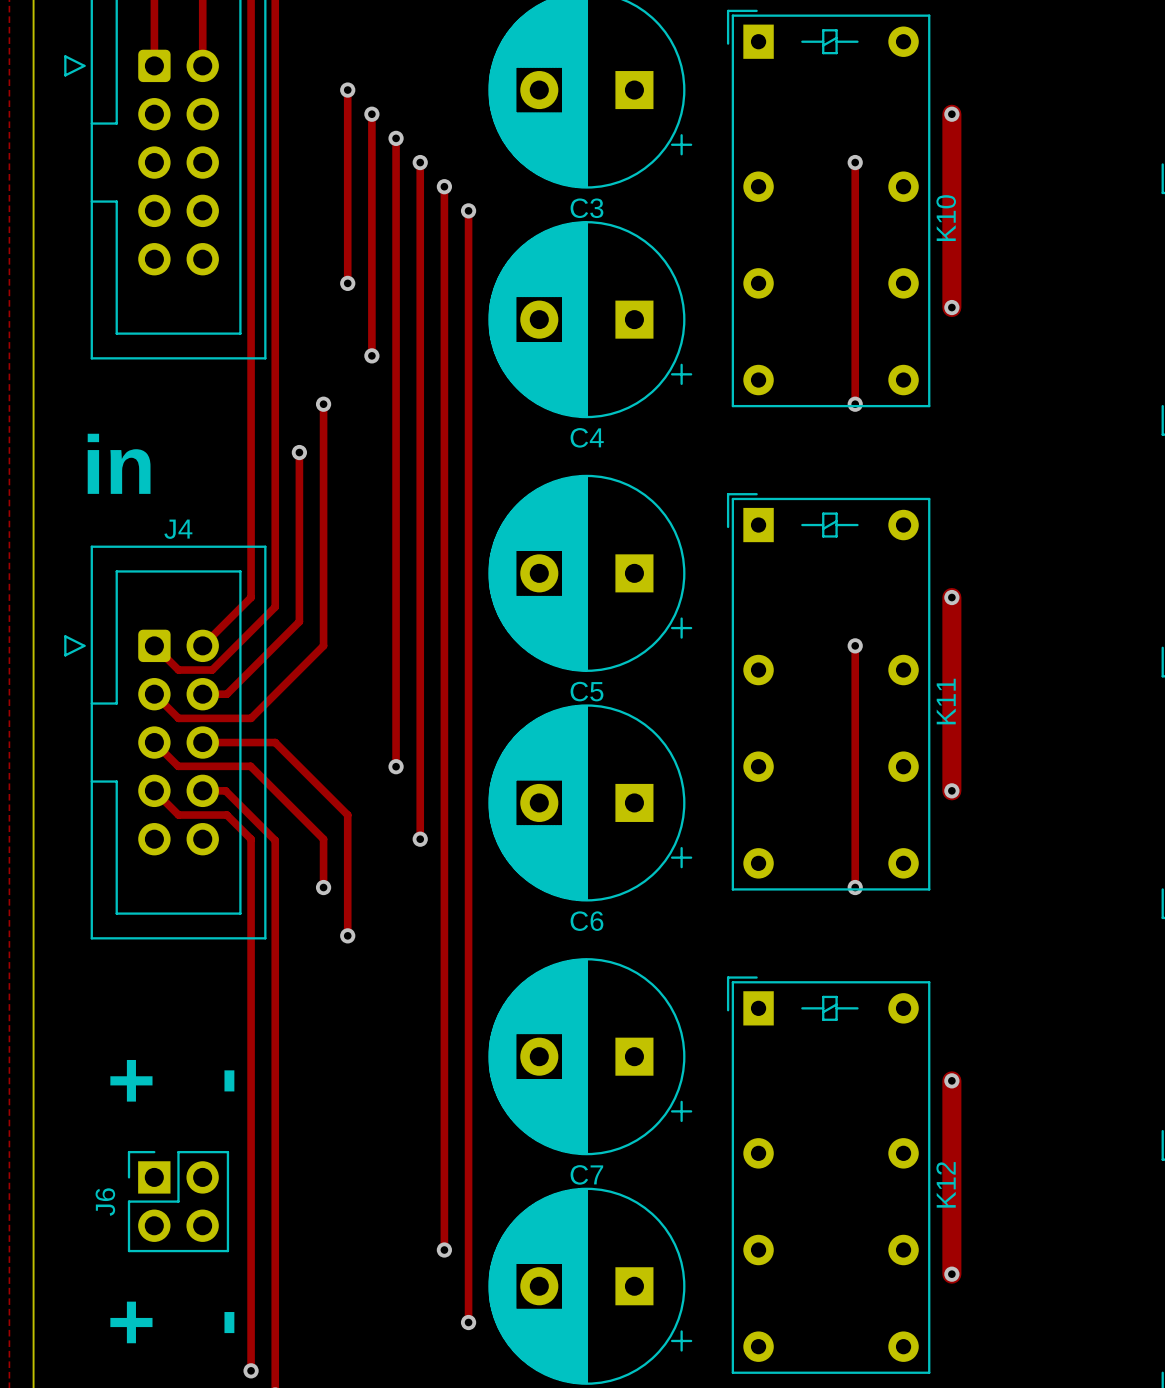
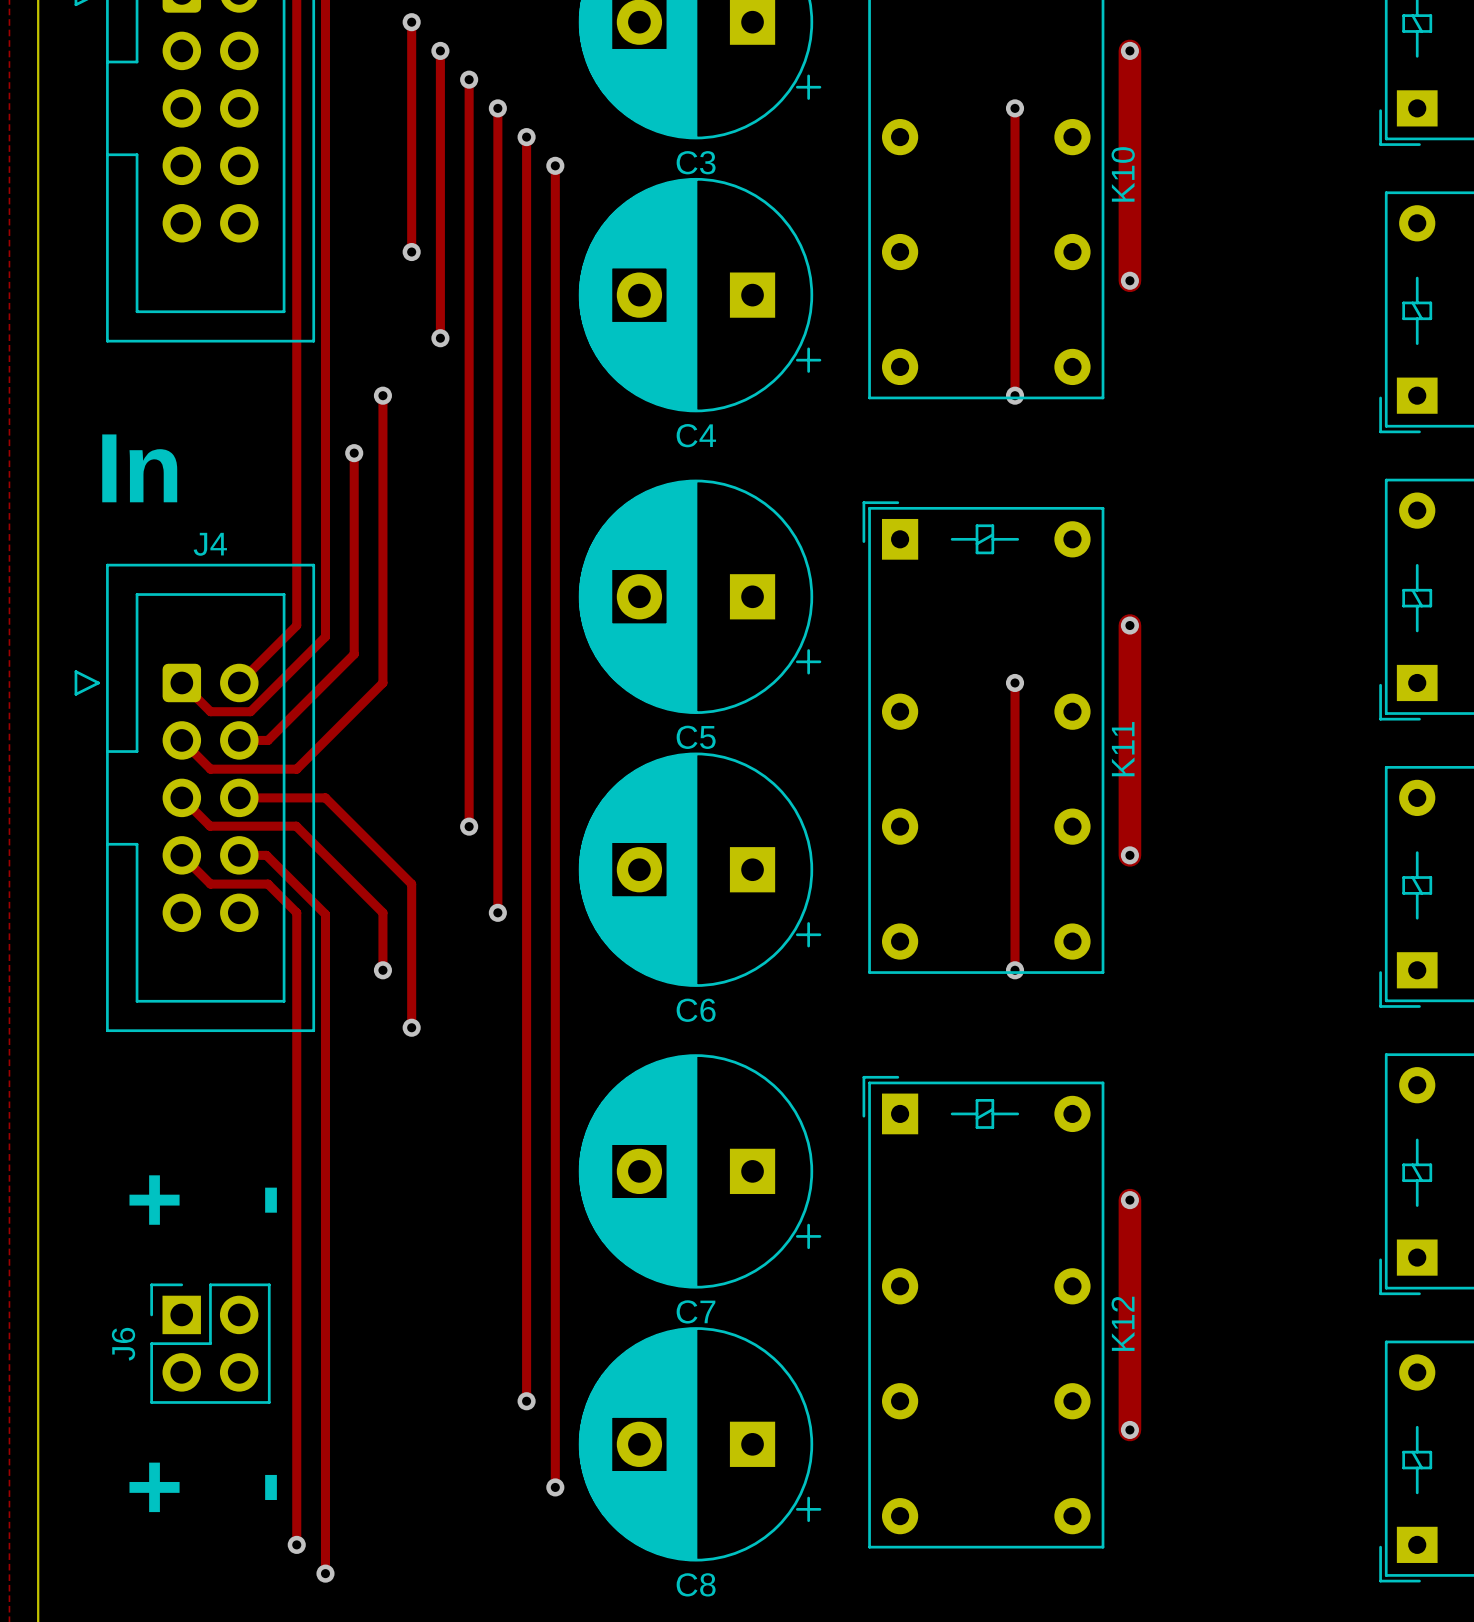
text: in (119, 463) -> In (139, 468)

